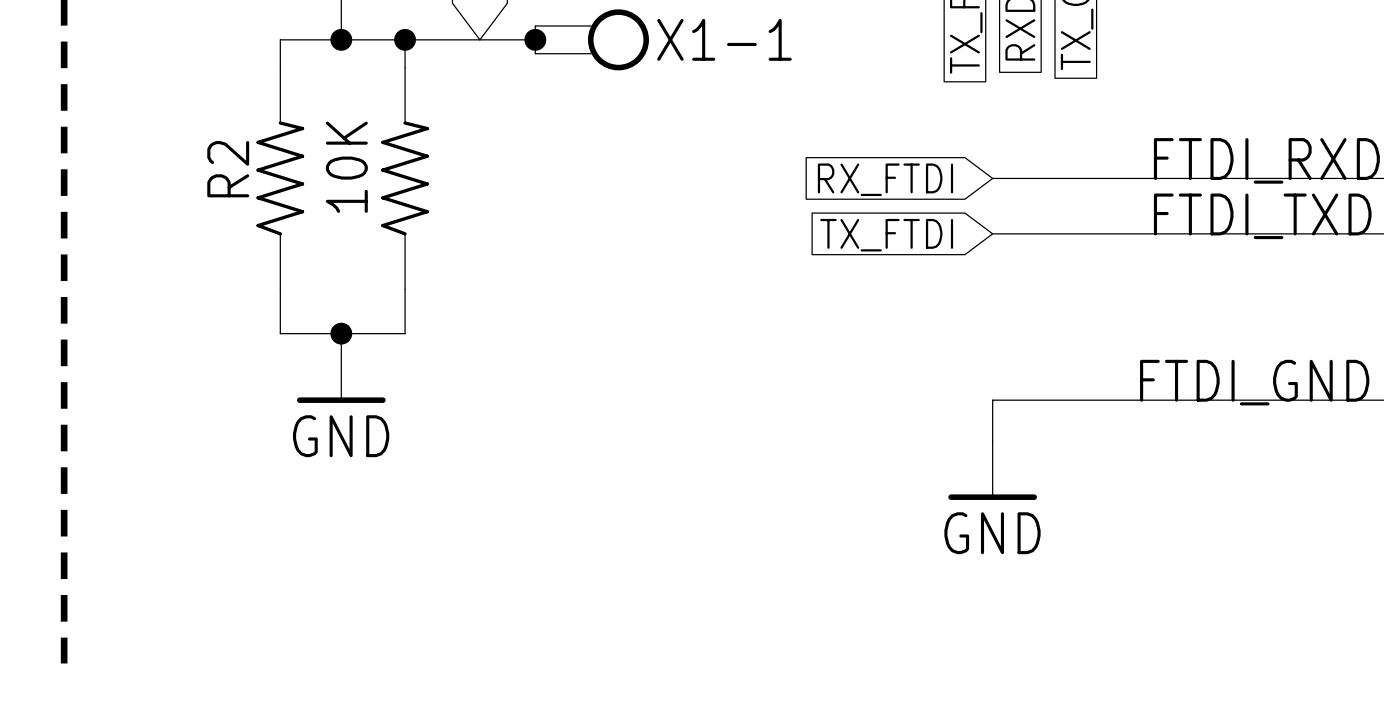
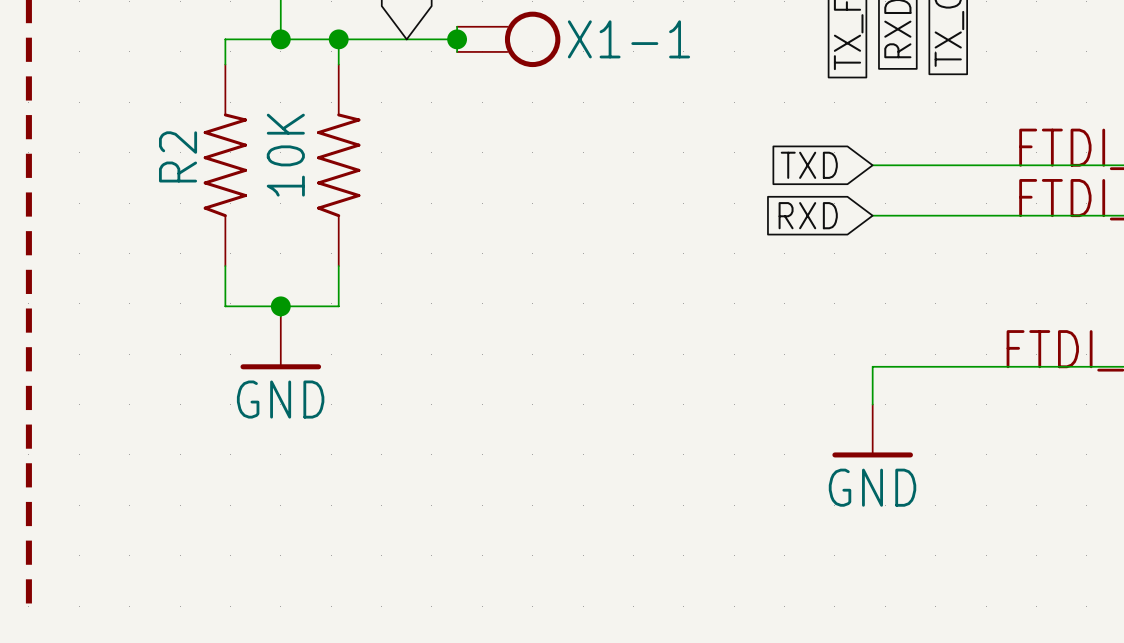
global label: RX_FTDI (885, 179) -> TXD (809, 165)
global label: TX_FTDI (886, 235) -> RXD (808, 215)

